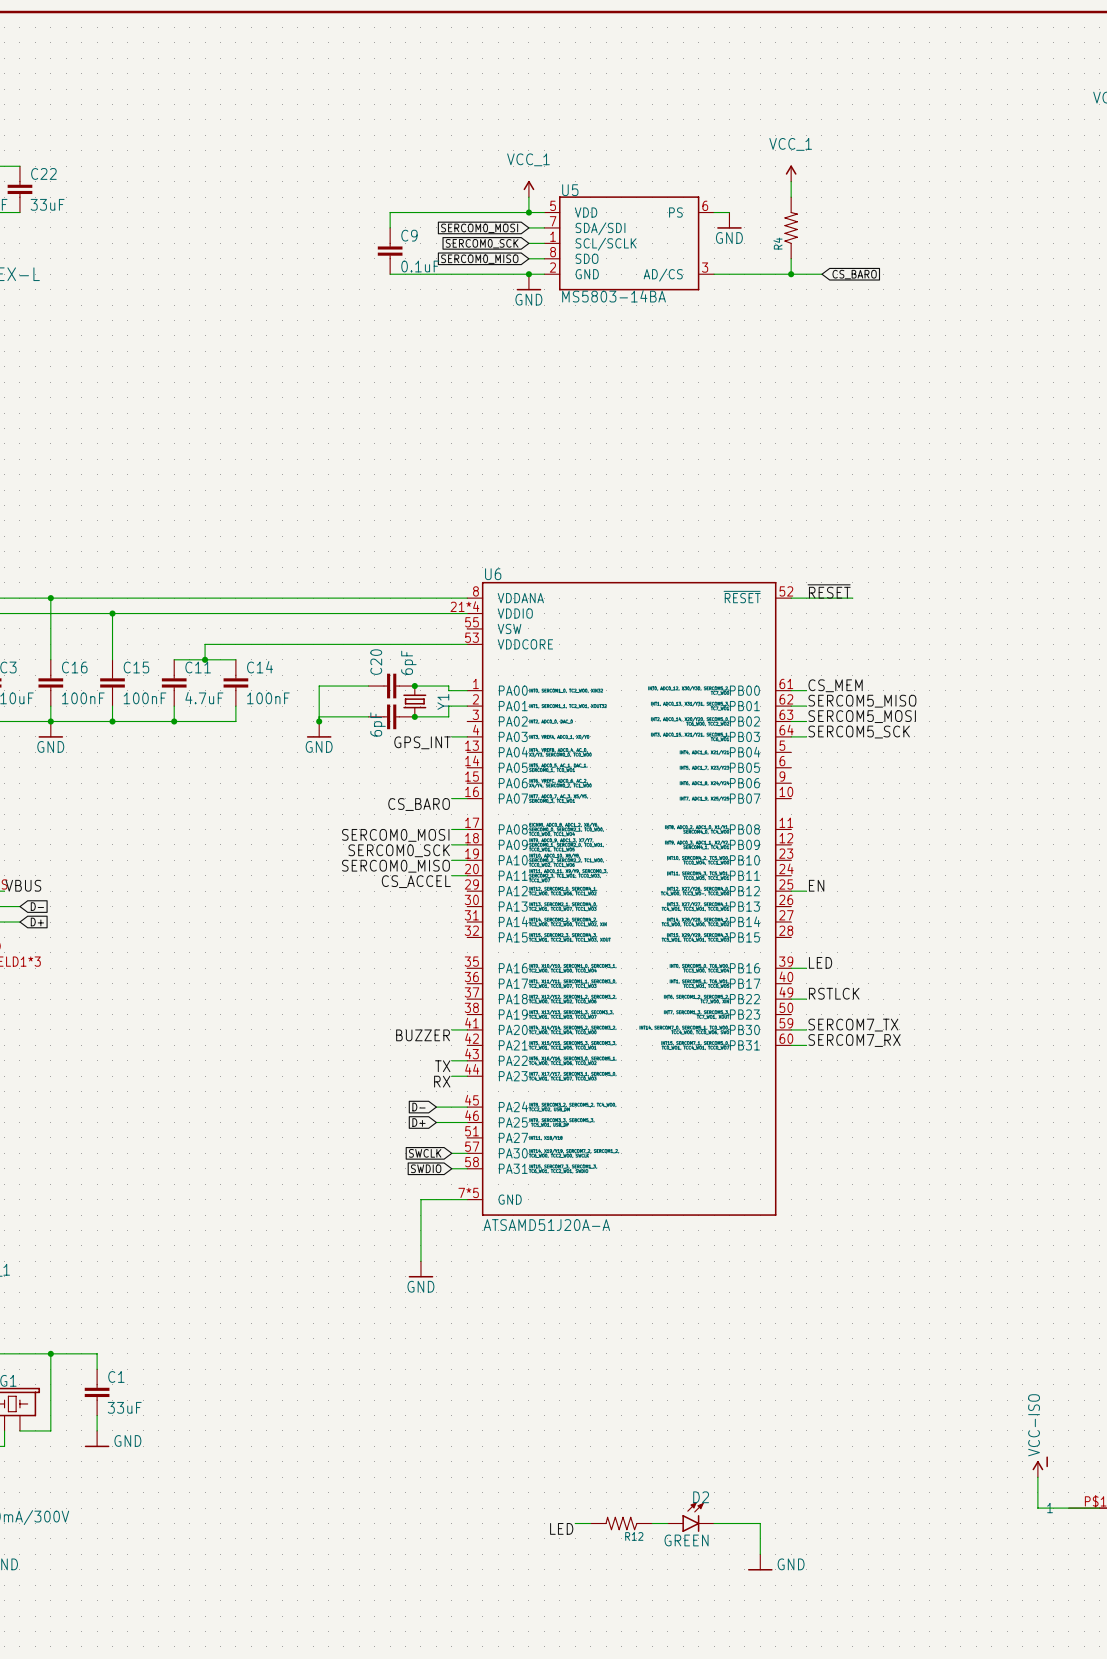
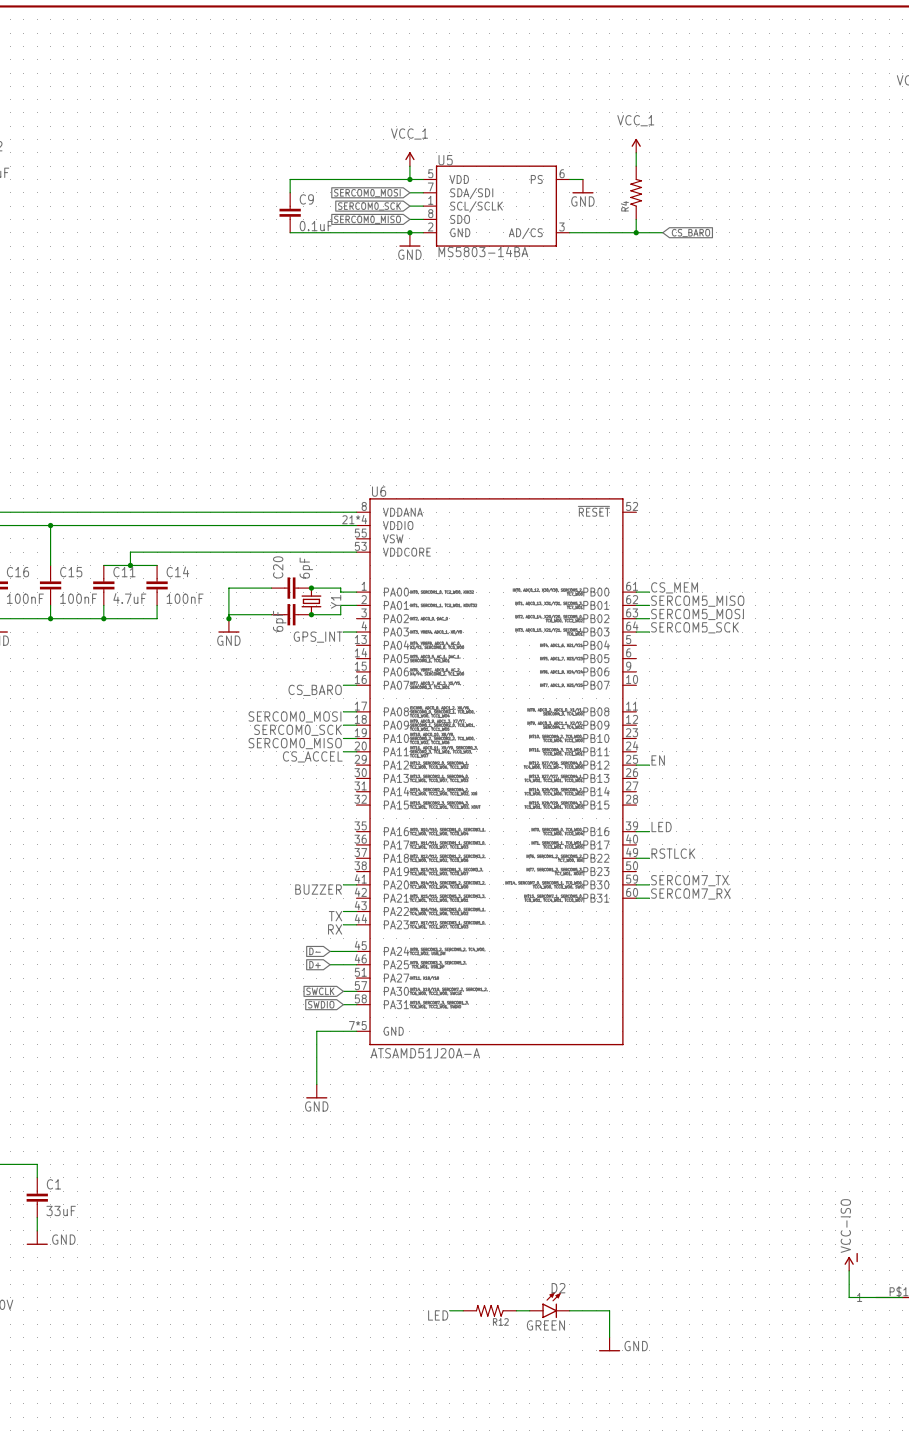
label: ~{RESET} (829, 591) -> none
wire: (791, 598) (852, 598) -> none

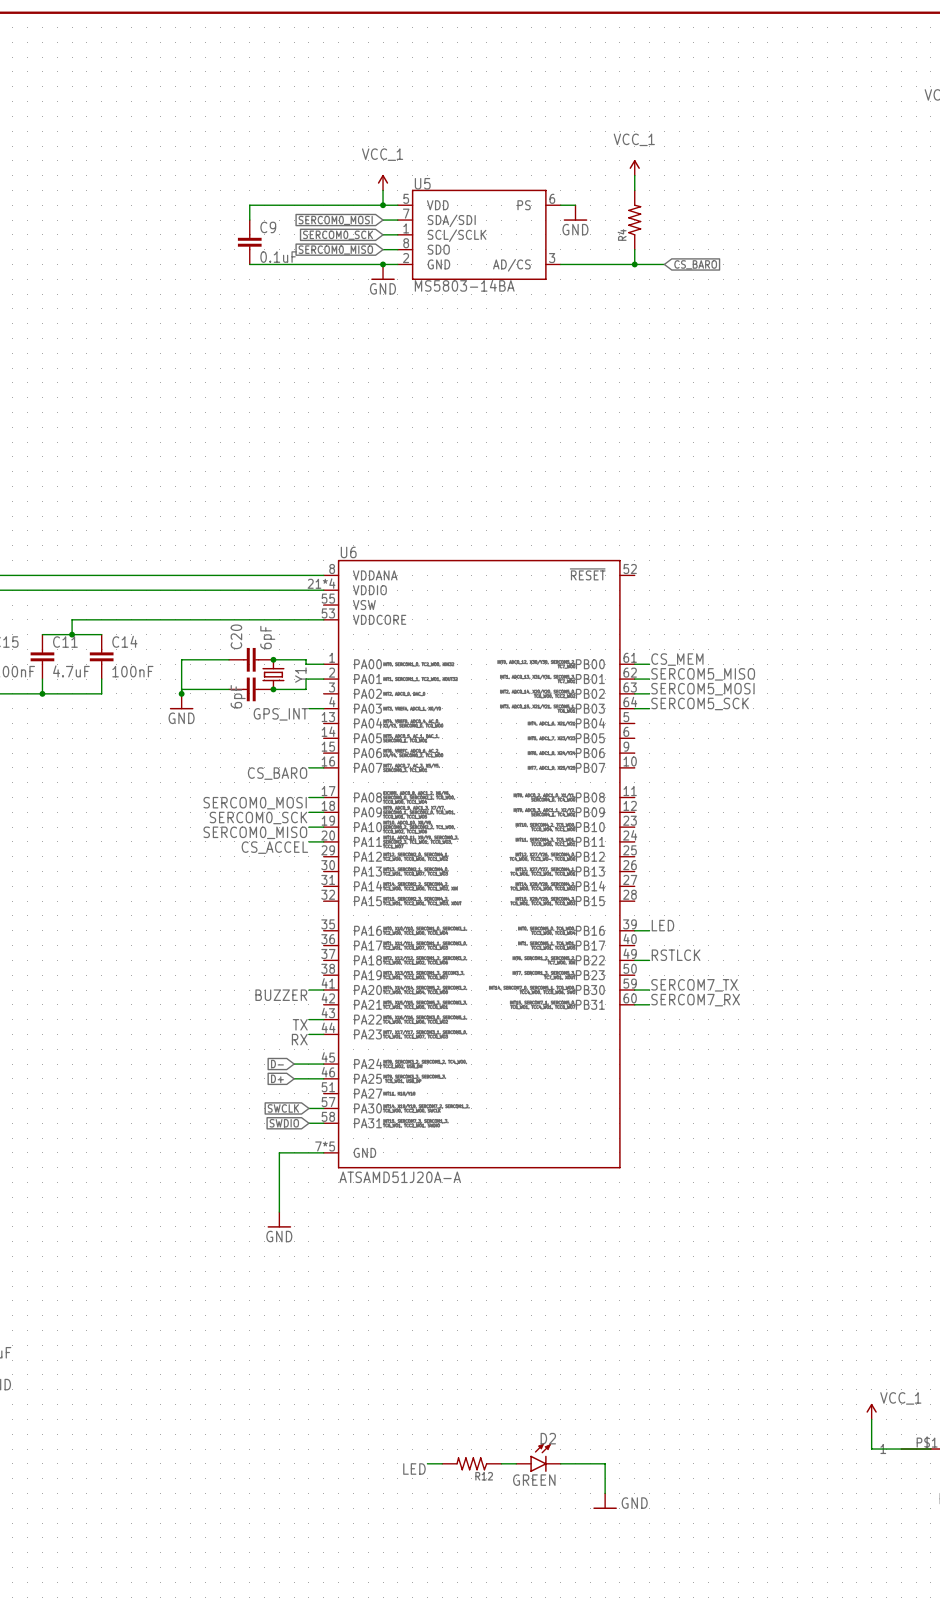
label: EN (658, 760) -> none
wire: (636, 765) (649, 765) -> none
power symbol: VCC-ISO (851, 1261) -> VCC_1 (871, 1411)

